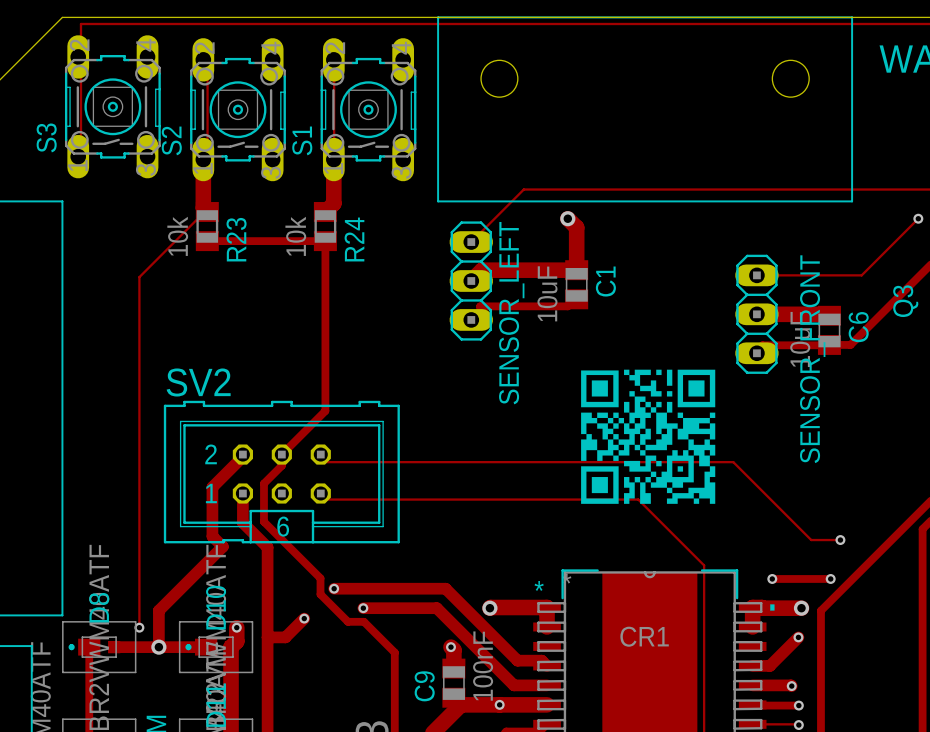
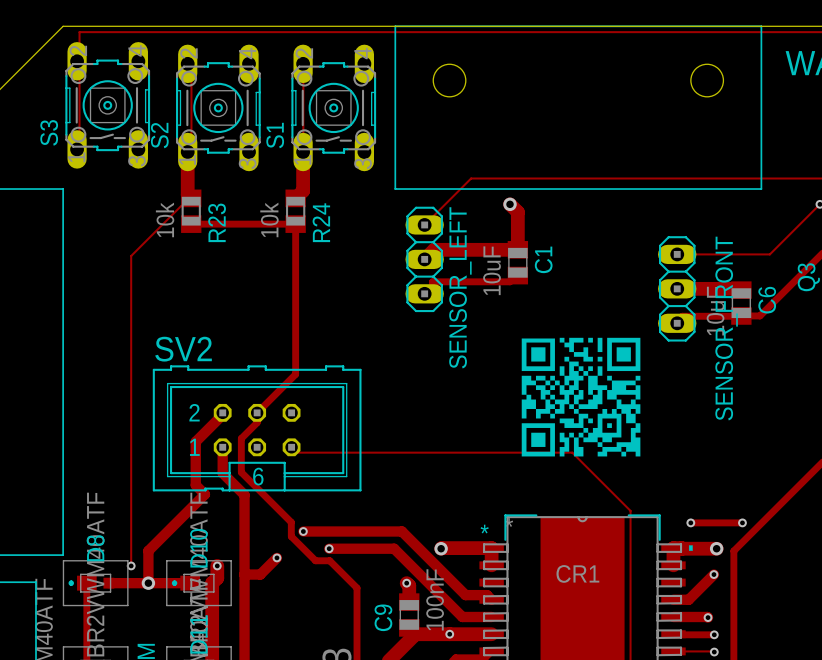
track: (320, 454) (324, 462) (733, 462) (811, 540) (840, 540) -> none
via: (840, 540) -> none

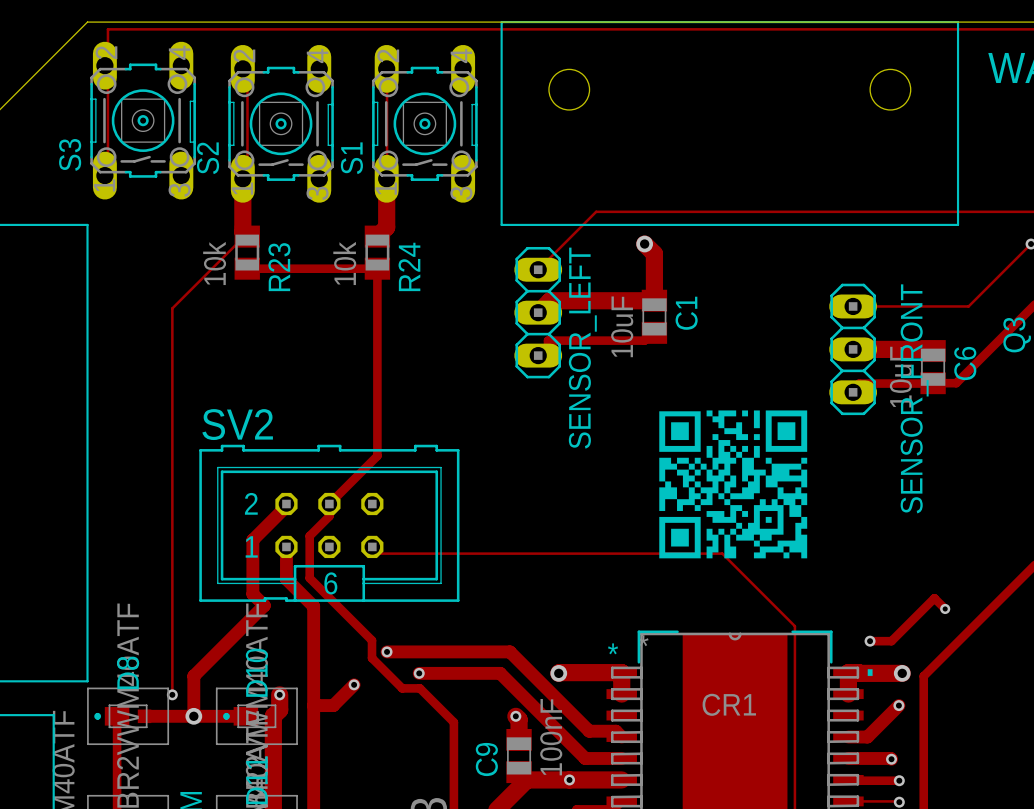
via: none -> (945, 608)
track: (708, 522) (742, 522) -> (891, 641) (934, 598) (945, 608)
via: (742, 522) -> none

